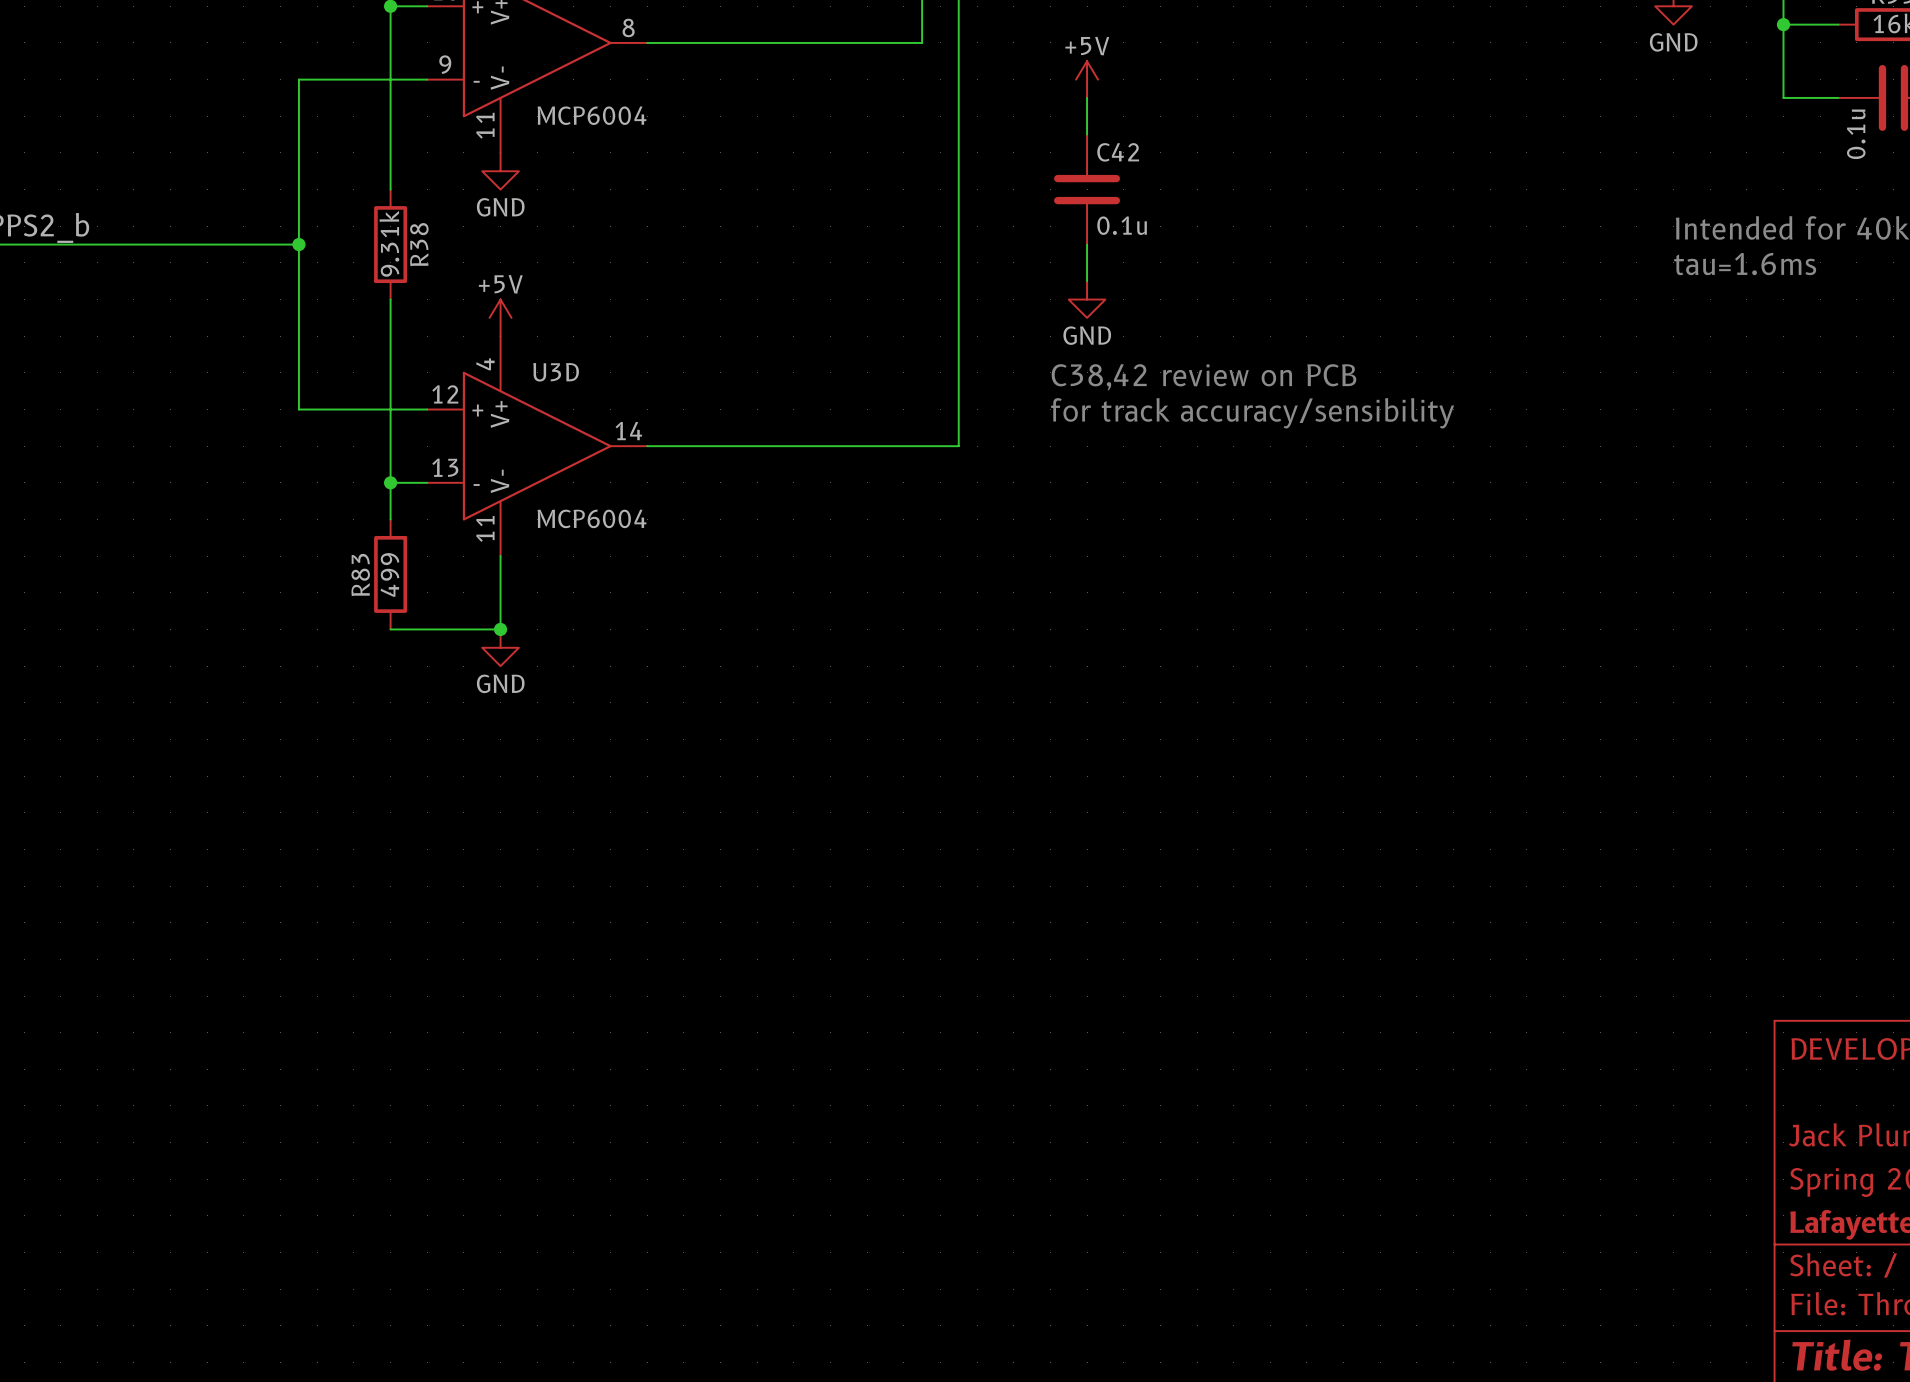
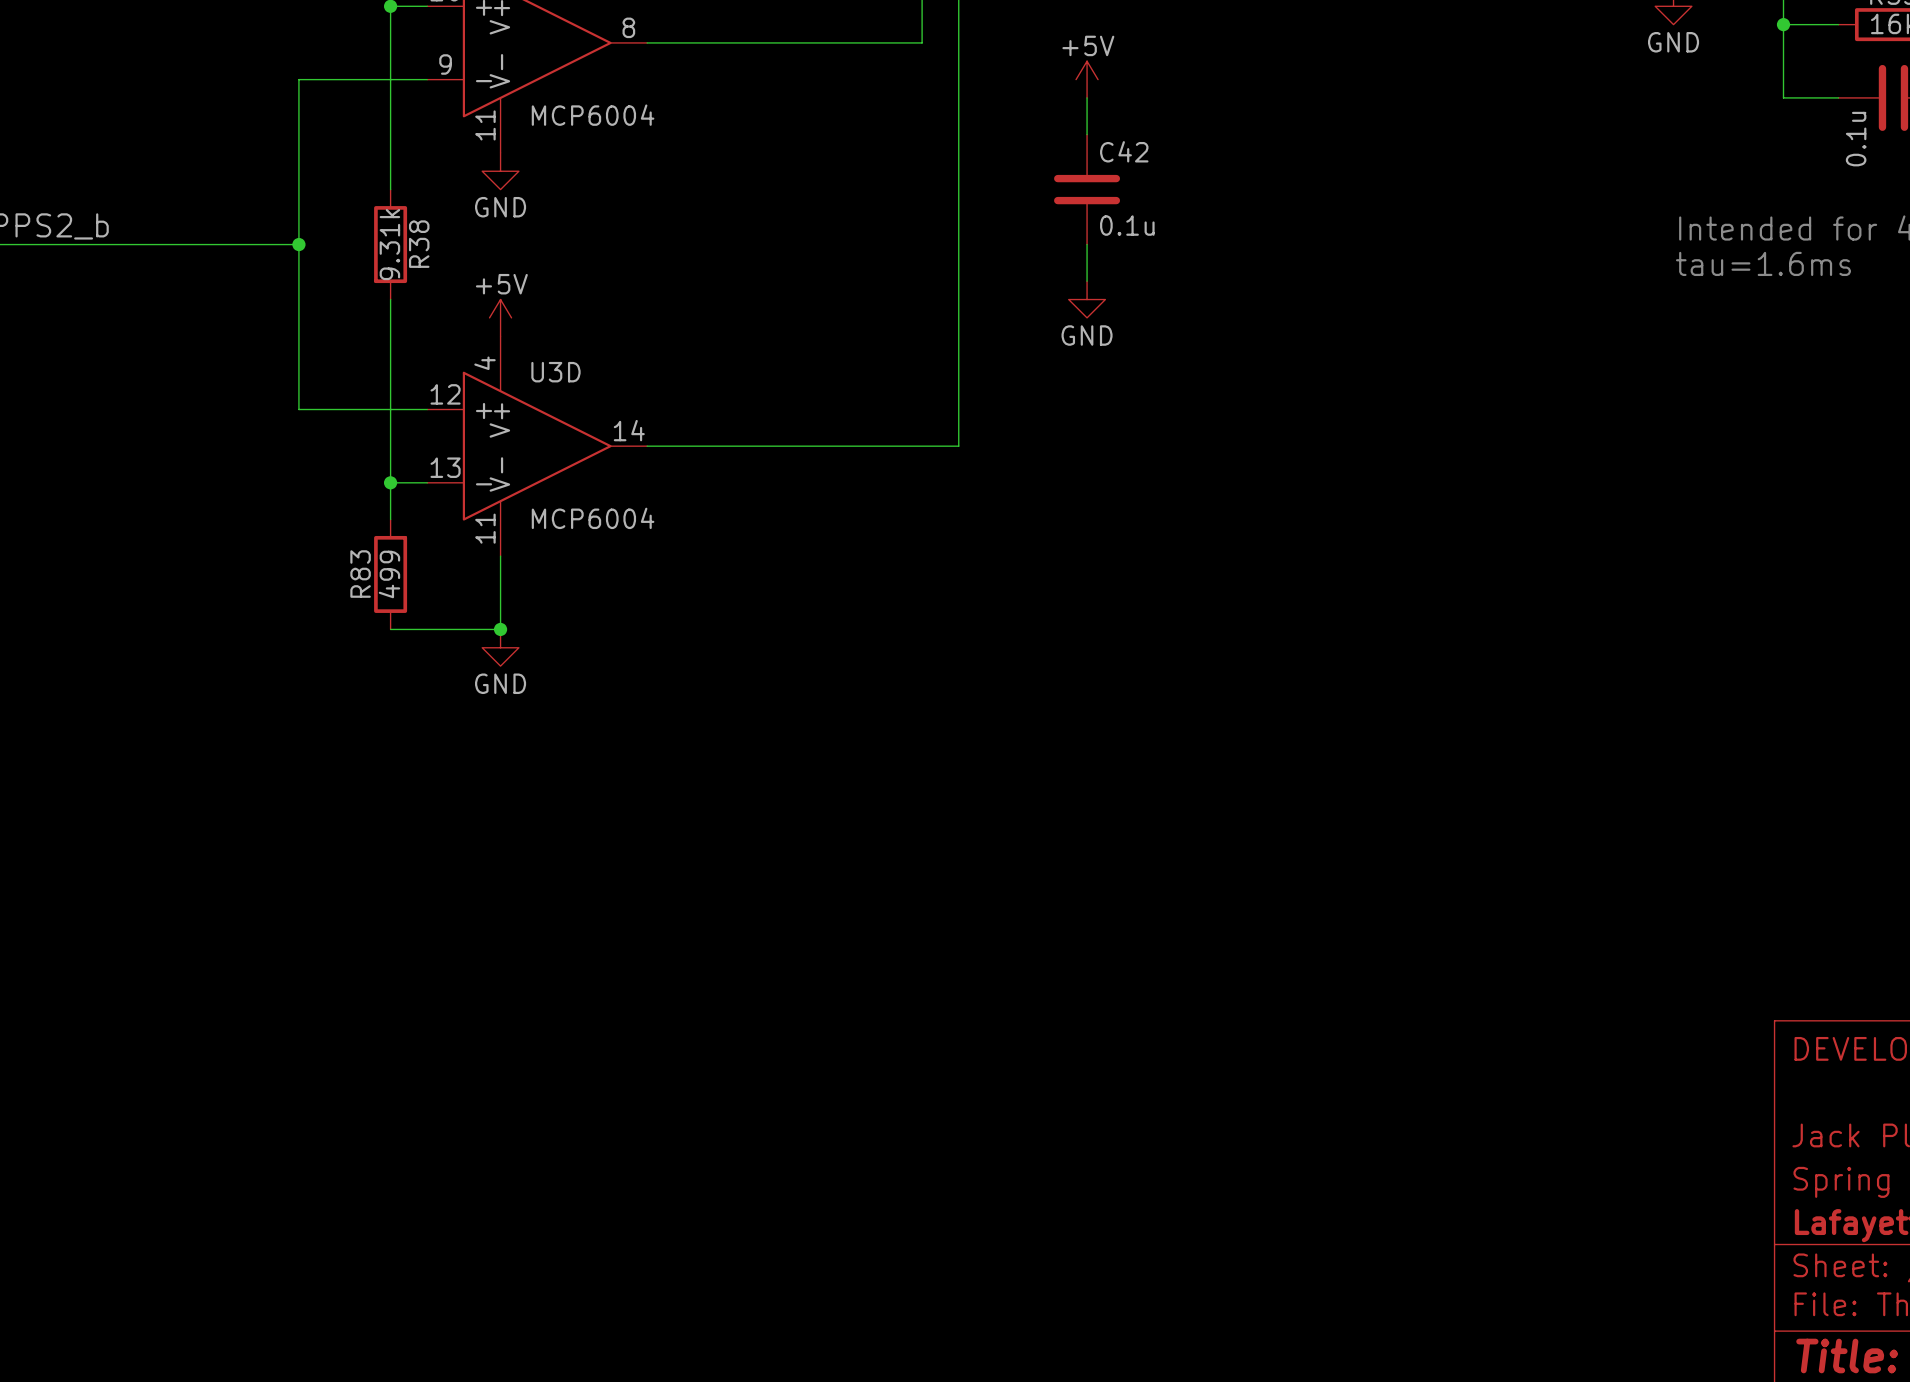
text: C38,42 review on PCB (1203, 377) -> none
text: for track accuracy/sensibility (1252, 413) -> none

